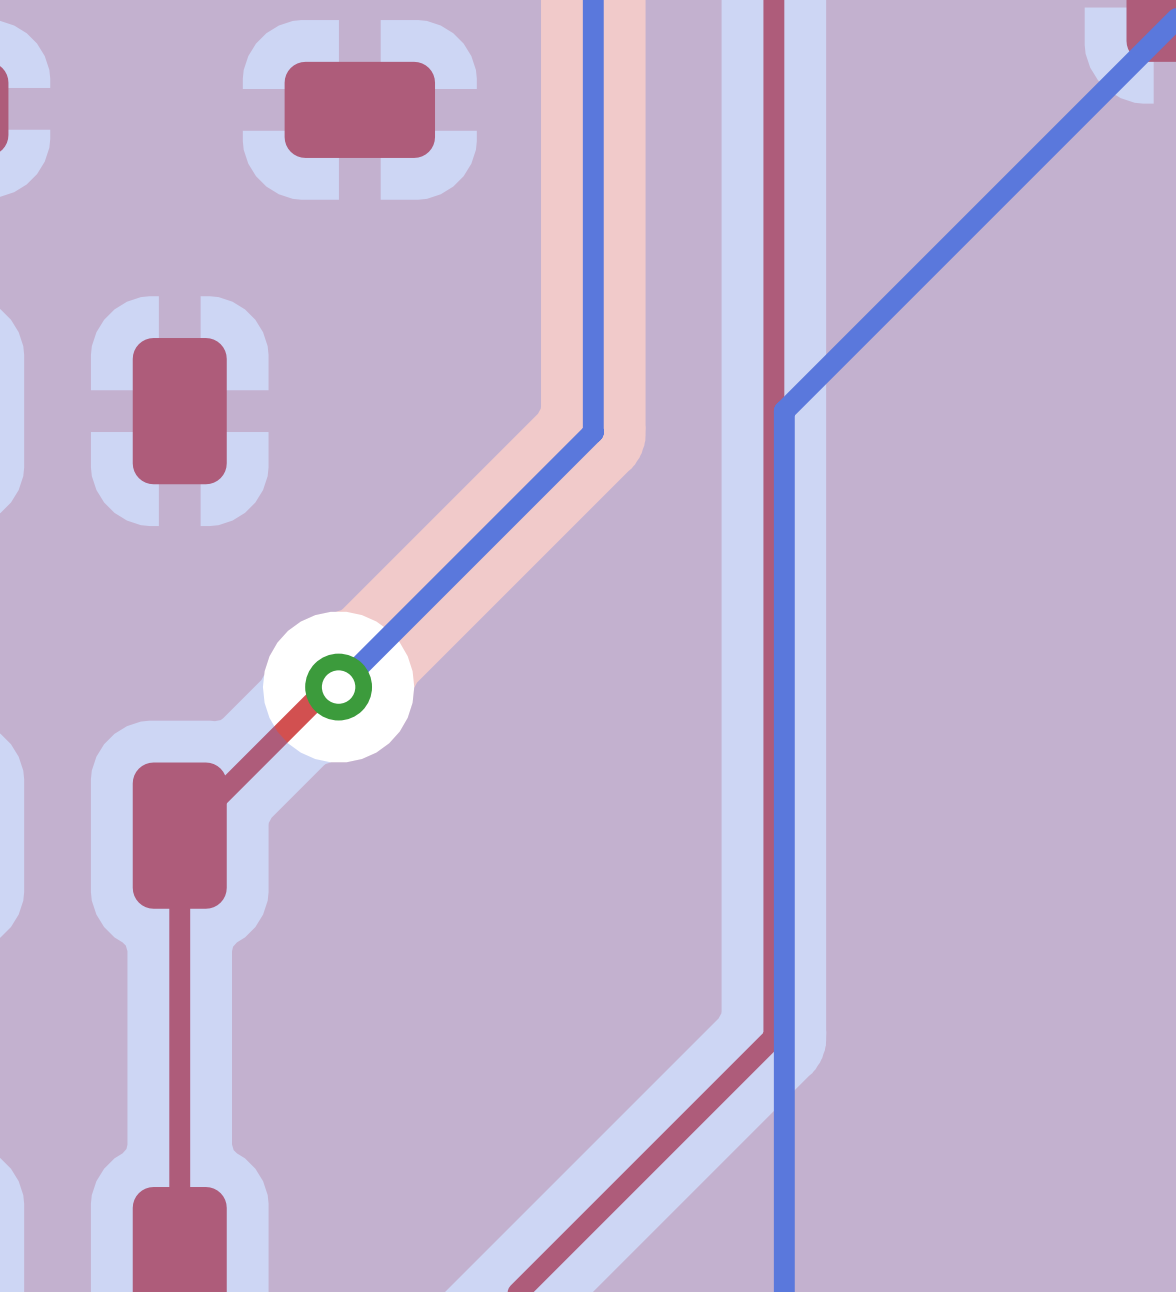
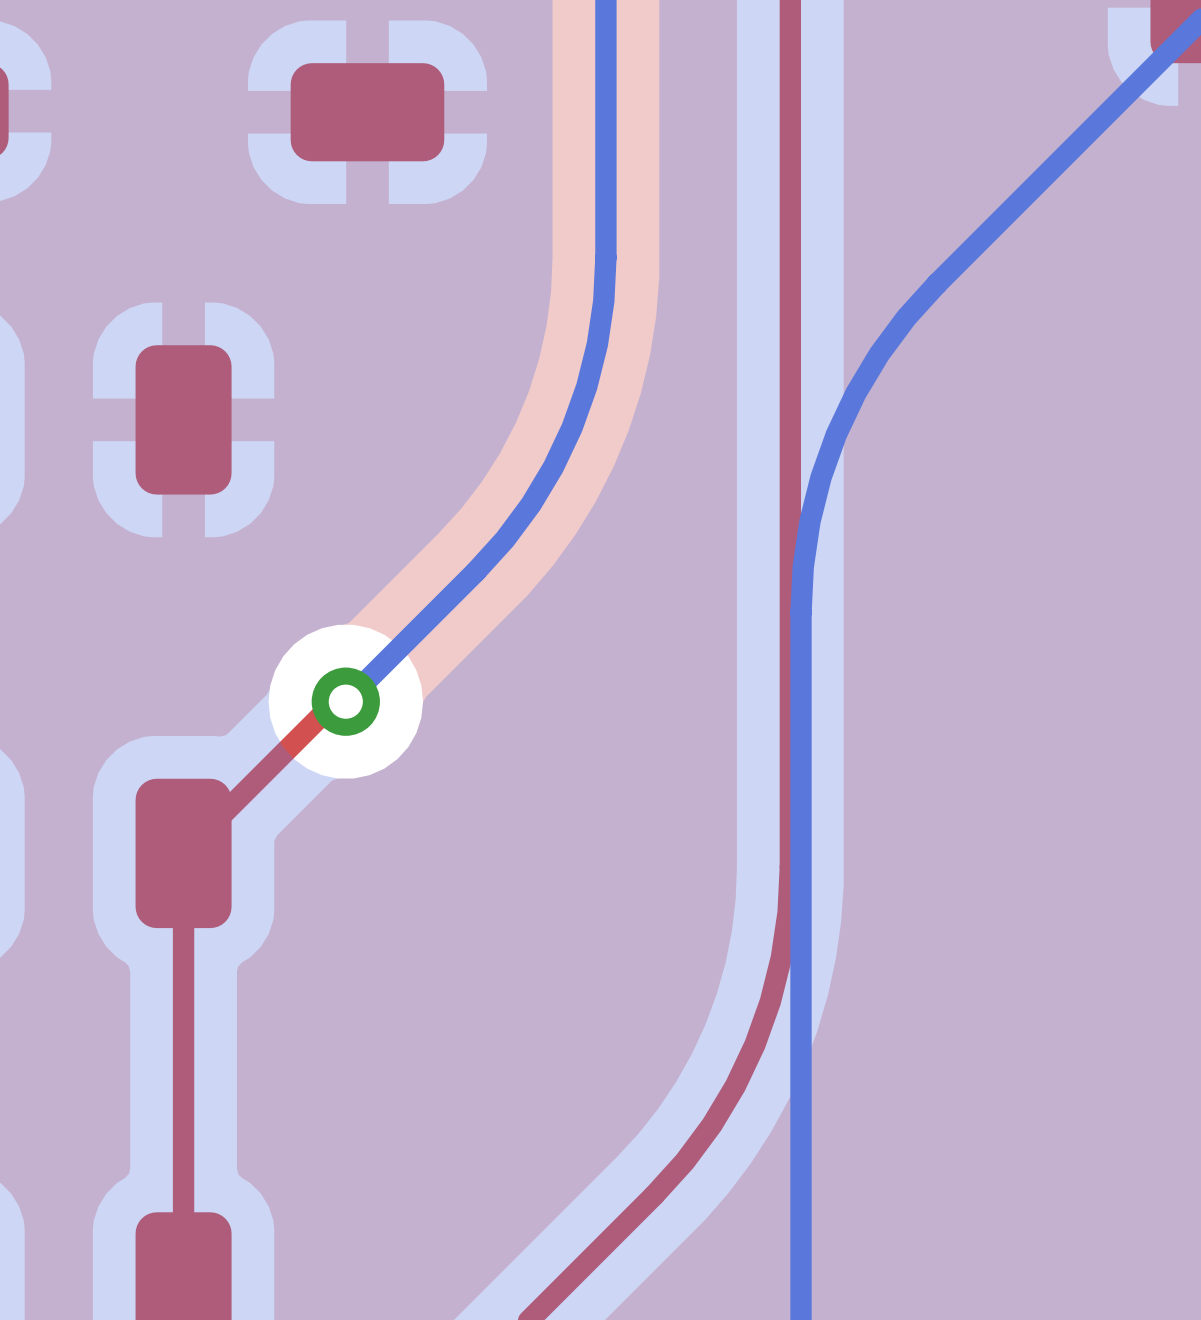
bottom track: (593, 252) (593, 432) (465, 559) -> (605, 257) (603, 301) (597, 344) (586, 386) (572, 427) (553, 466) (531, 504) (505, 539) (475, 571)
bottom track: (917, 277) (784, 411) (784, 599) -> (937, 283) (906, 317) (879, 354) (855, 393) (836, 434) (821, 477) (809, 521) (803, 566) (801, 612)
top track: (773, 848) (773, 1037) (640, 1170) -> (790, 866) (788, 912) (781, 957) (770, 1001) (754, 1044) (735, 1085) (712, 1124) (684, 1161) (654, 1195)

